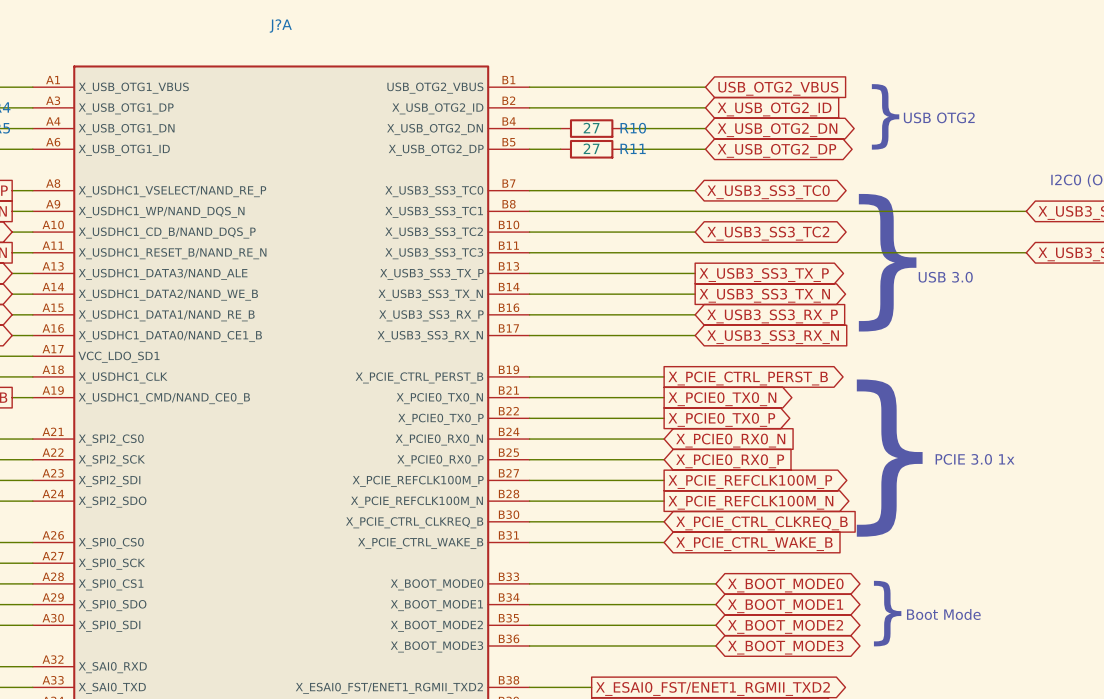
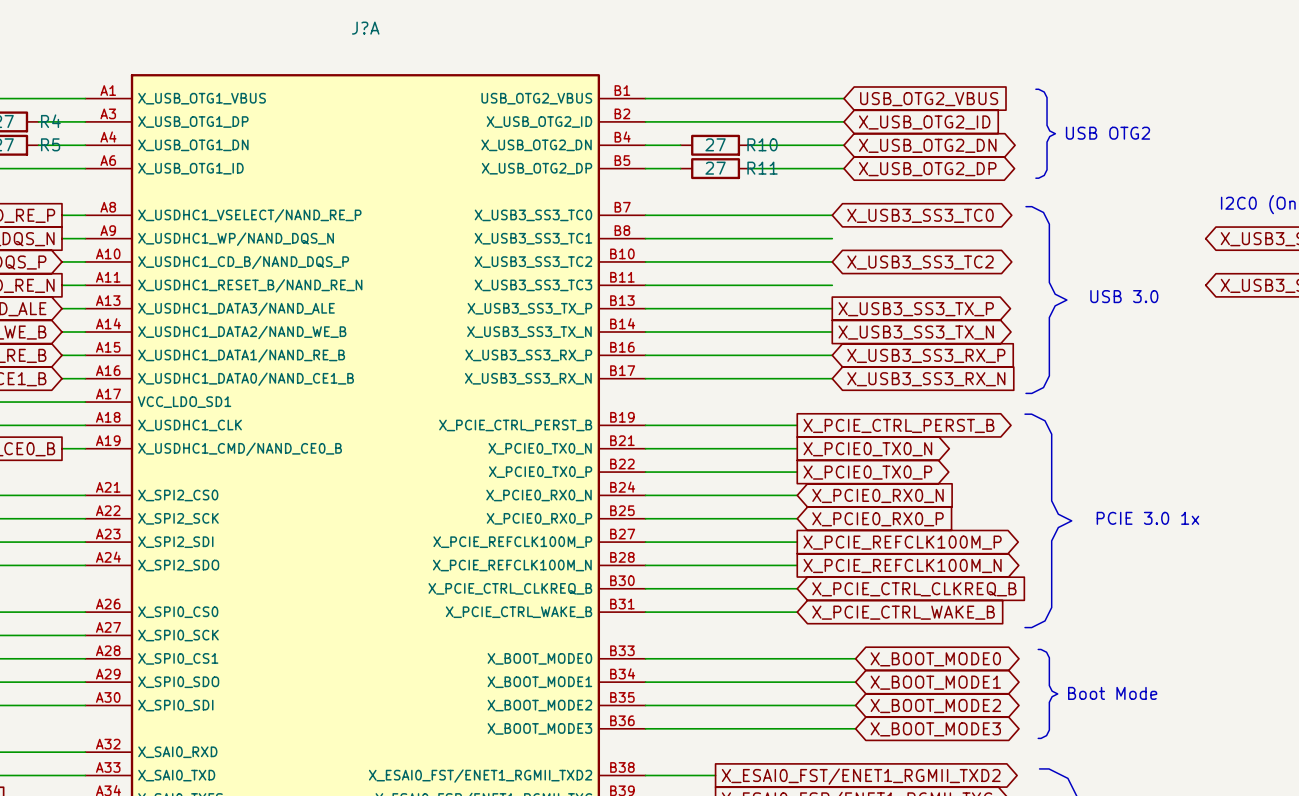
wire: (695, 211) (1026, 211) -> none
wire: (695, 252) (1026, 252) -> none
text position: USB 3.0 (945, 277) -> USB 3.0 (1124, 296)

